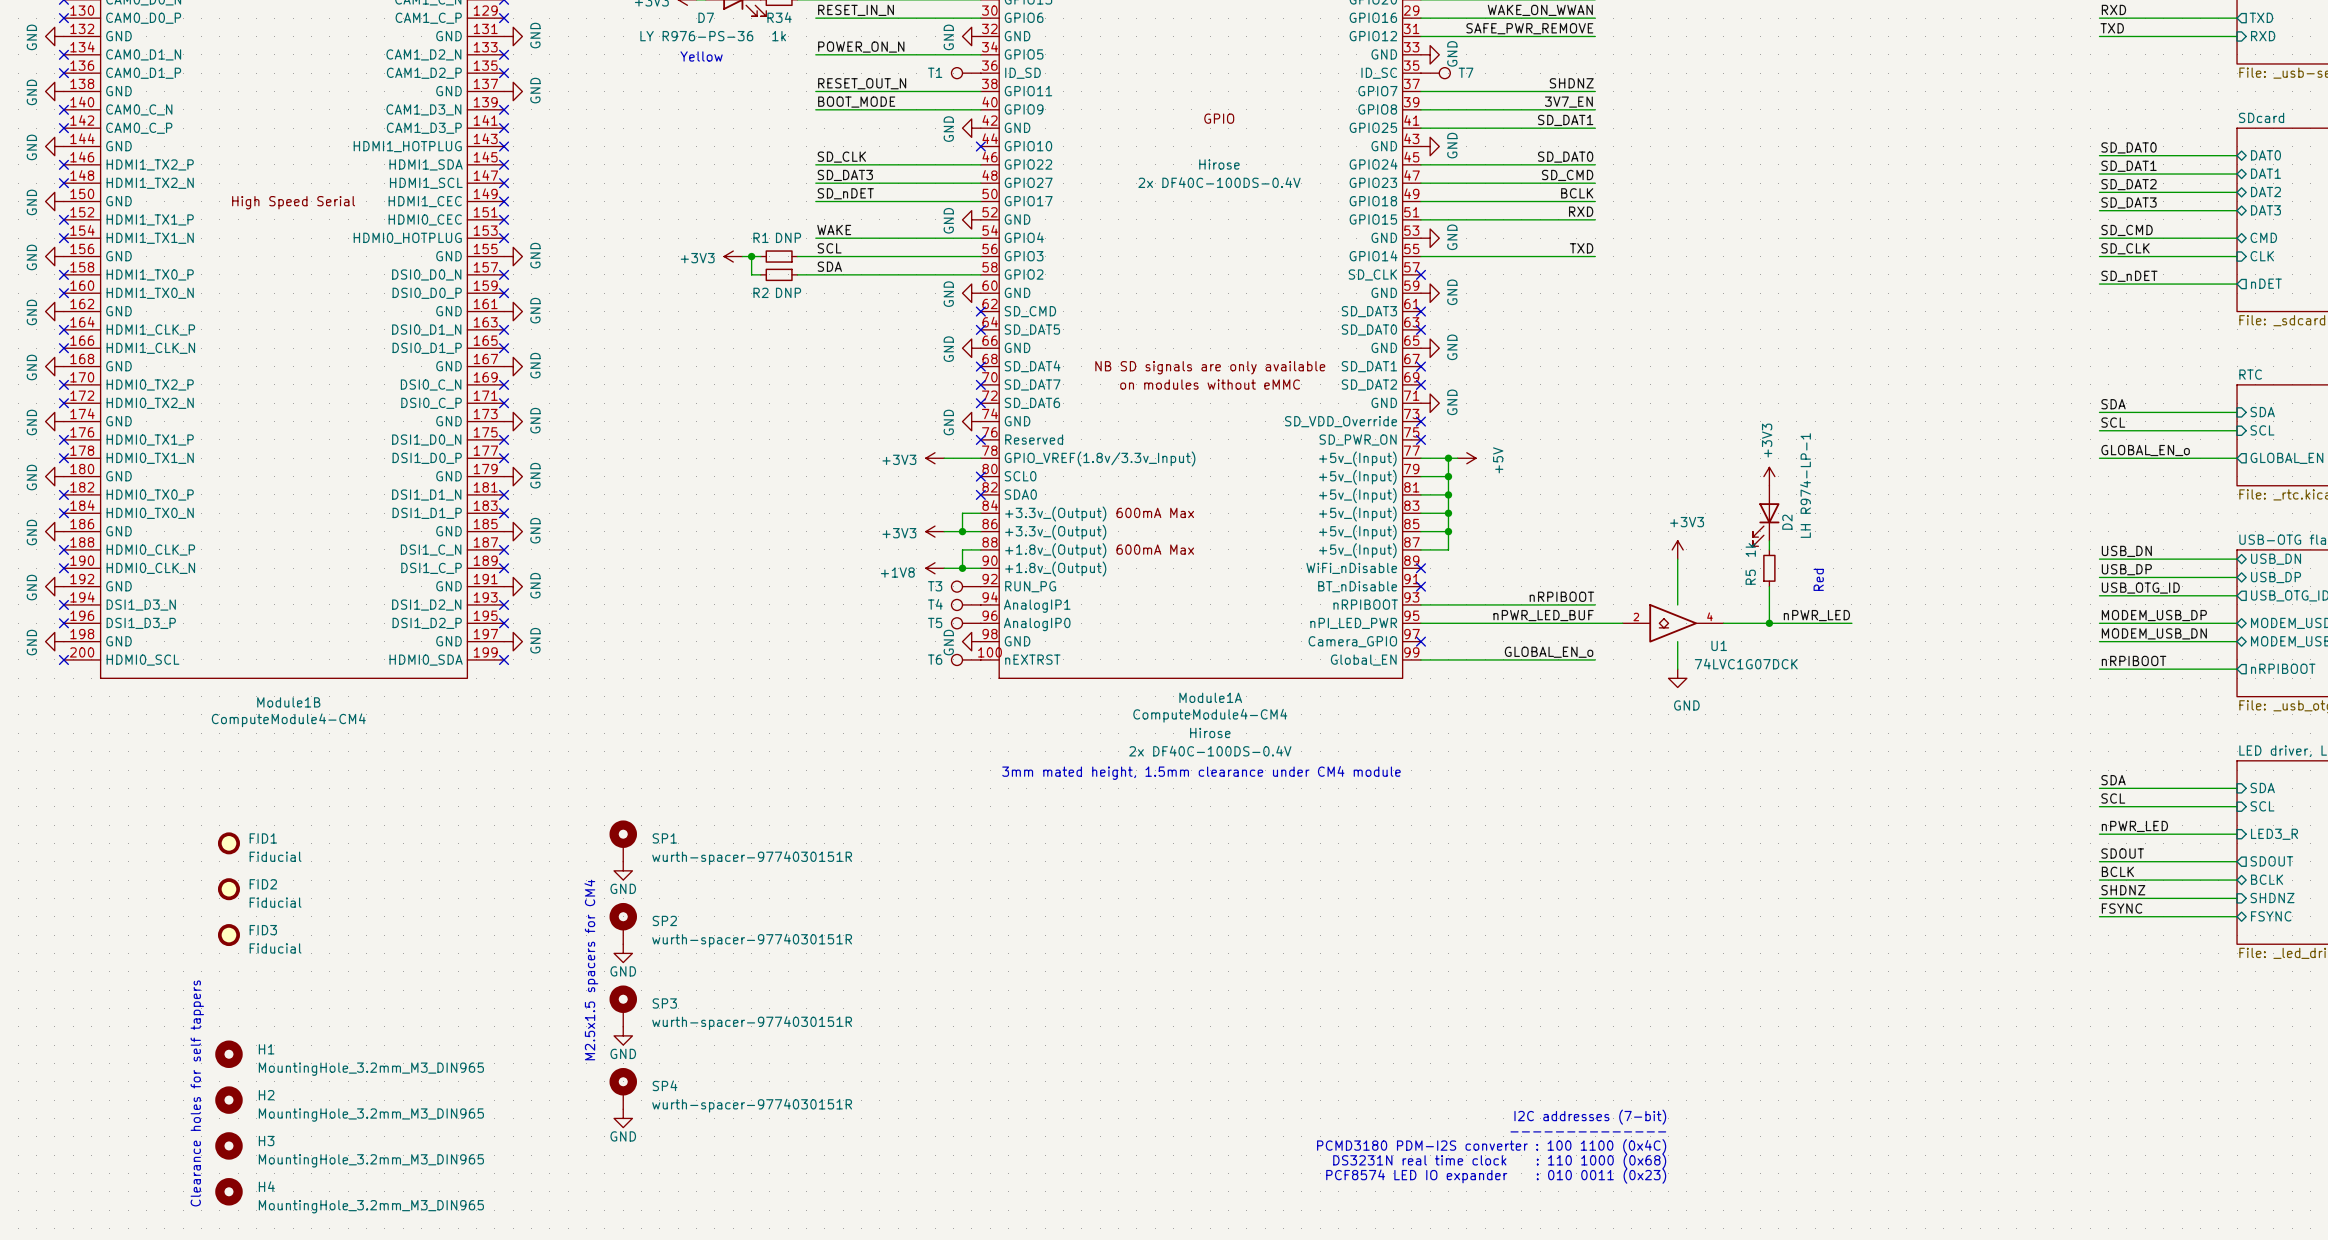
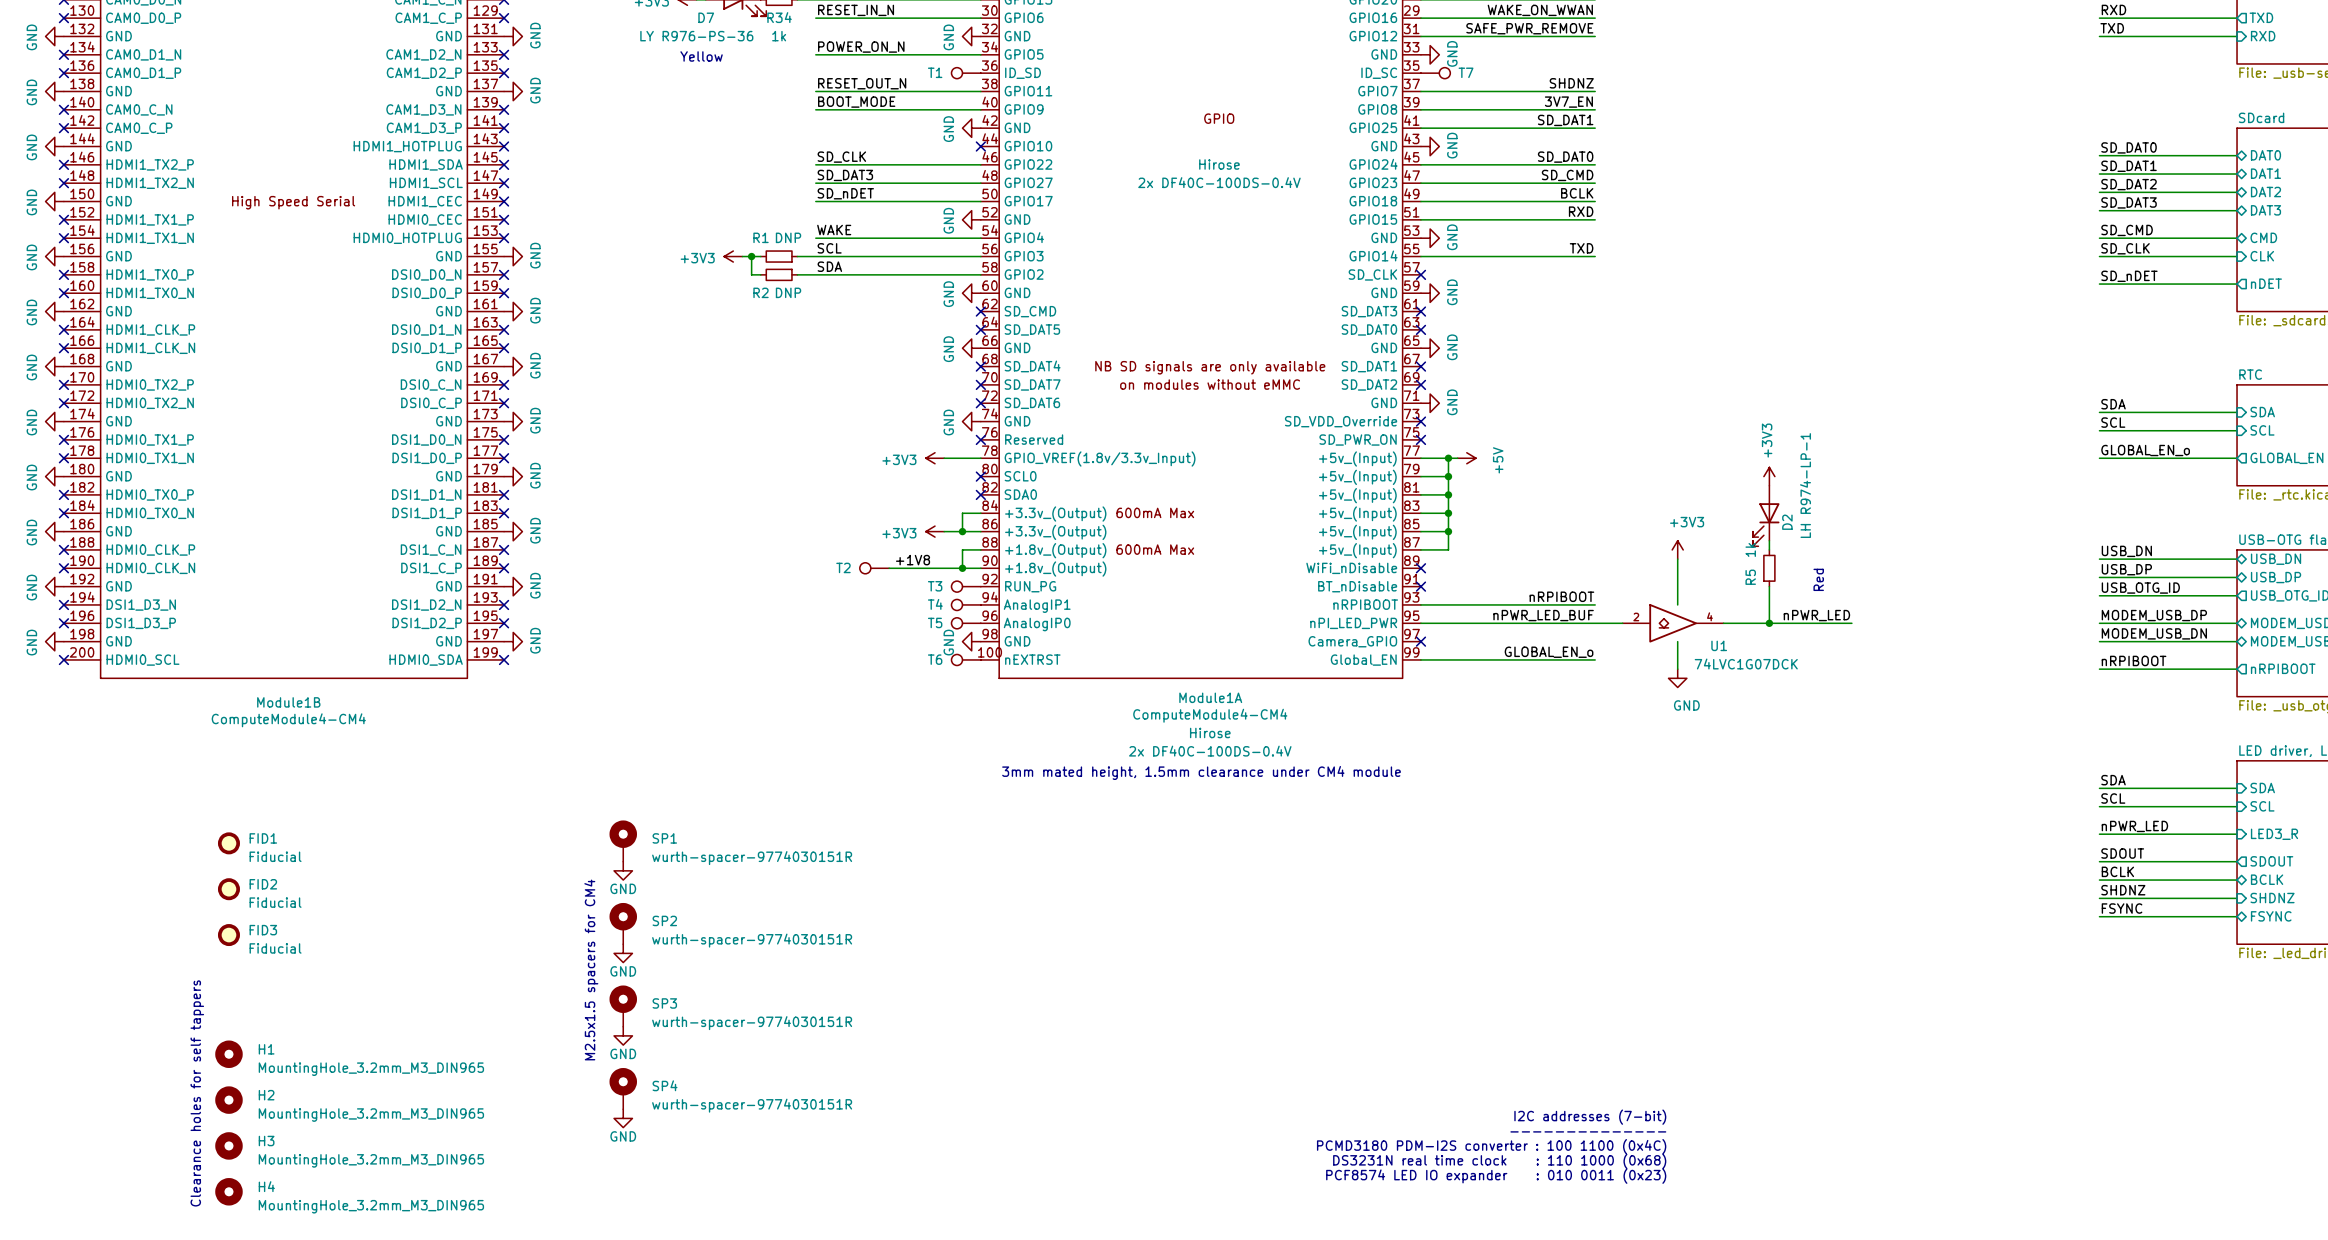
label: none -> +1V8 (913, 560)
T2: none -> (874, 568)
wire: none -> (889, 568) (944, 568)
power symbol: +1V8 (935, 568) -> none

